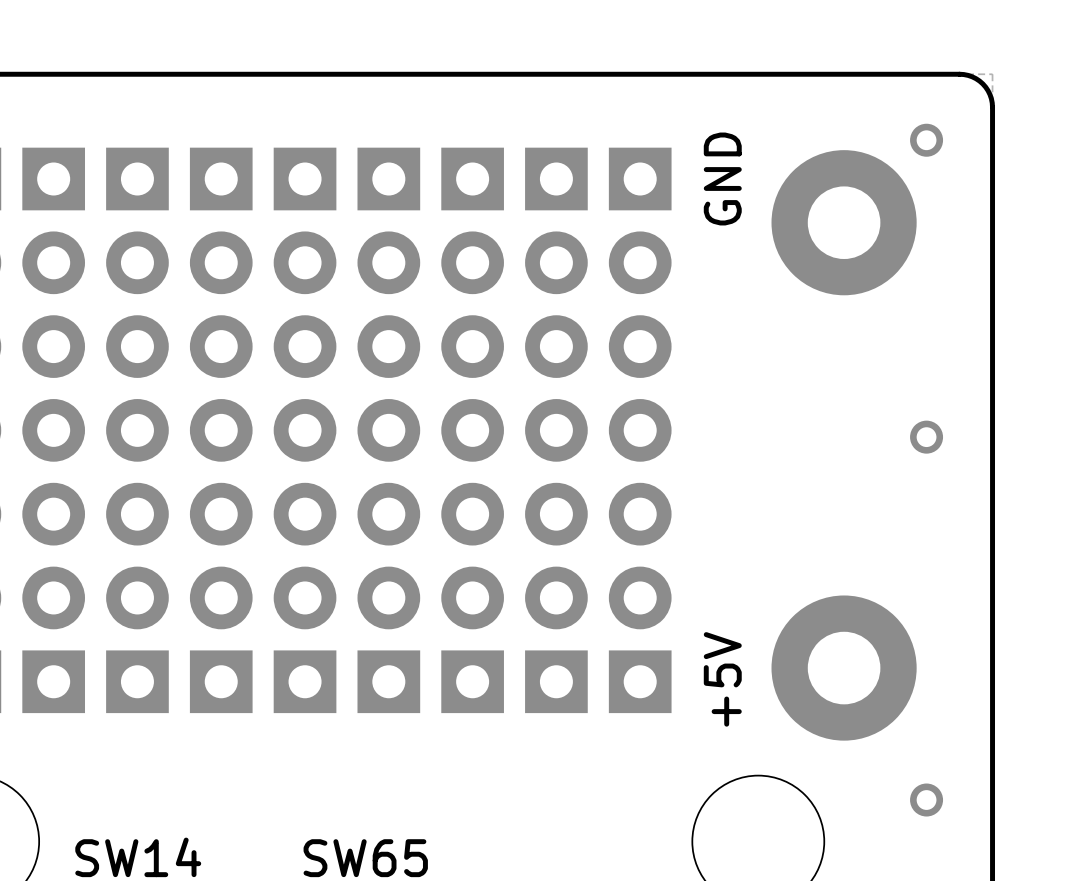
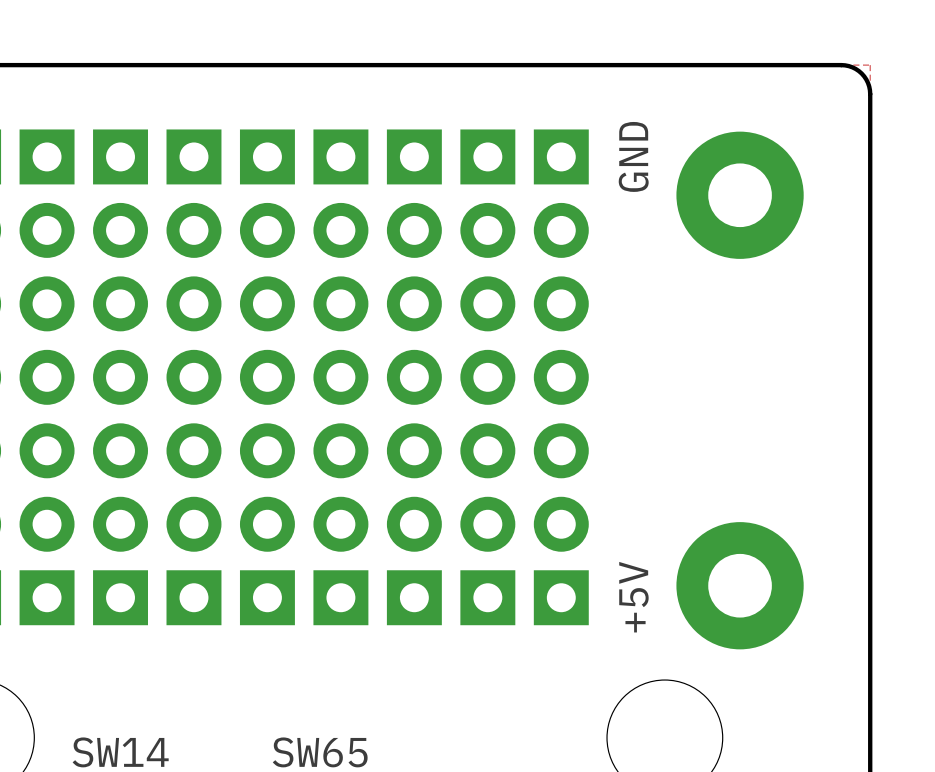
via: (926, 140) -> none
via: (926, 437) -> none
via: (926, 800) -> none

